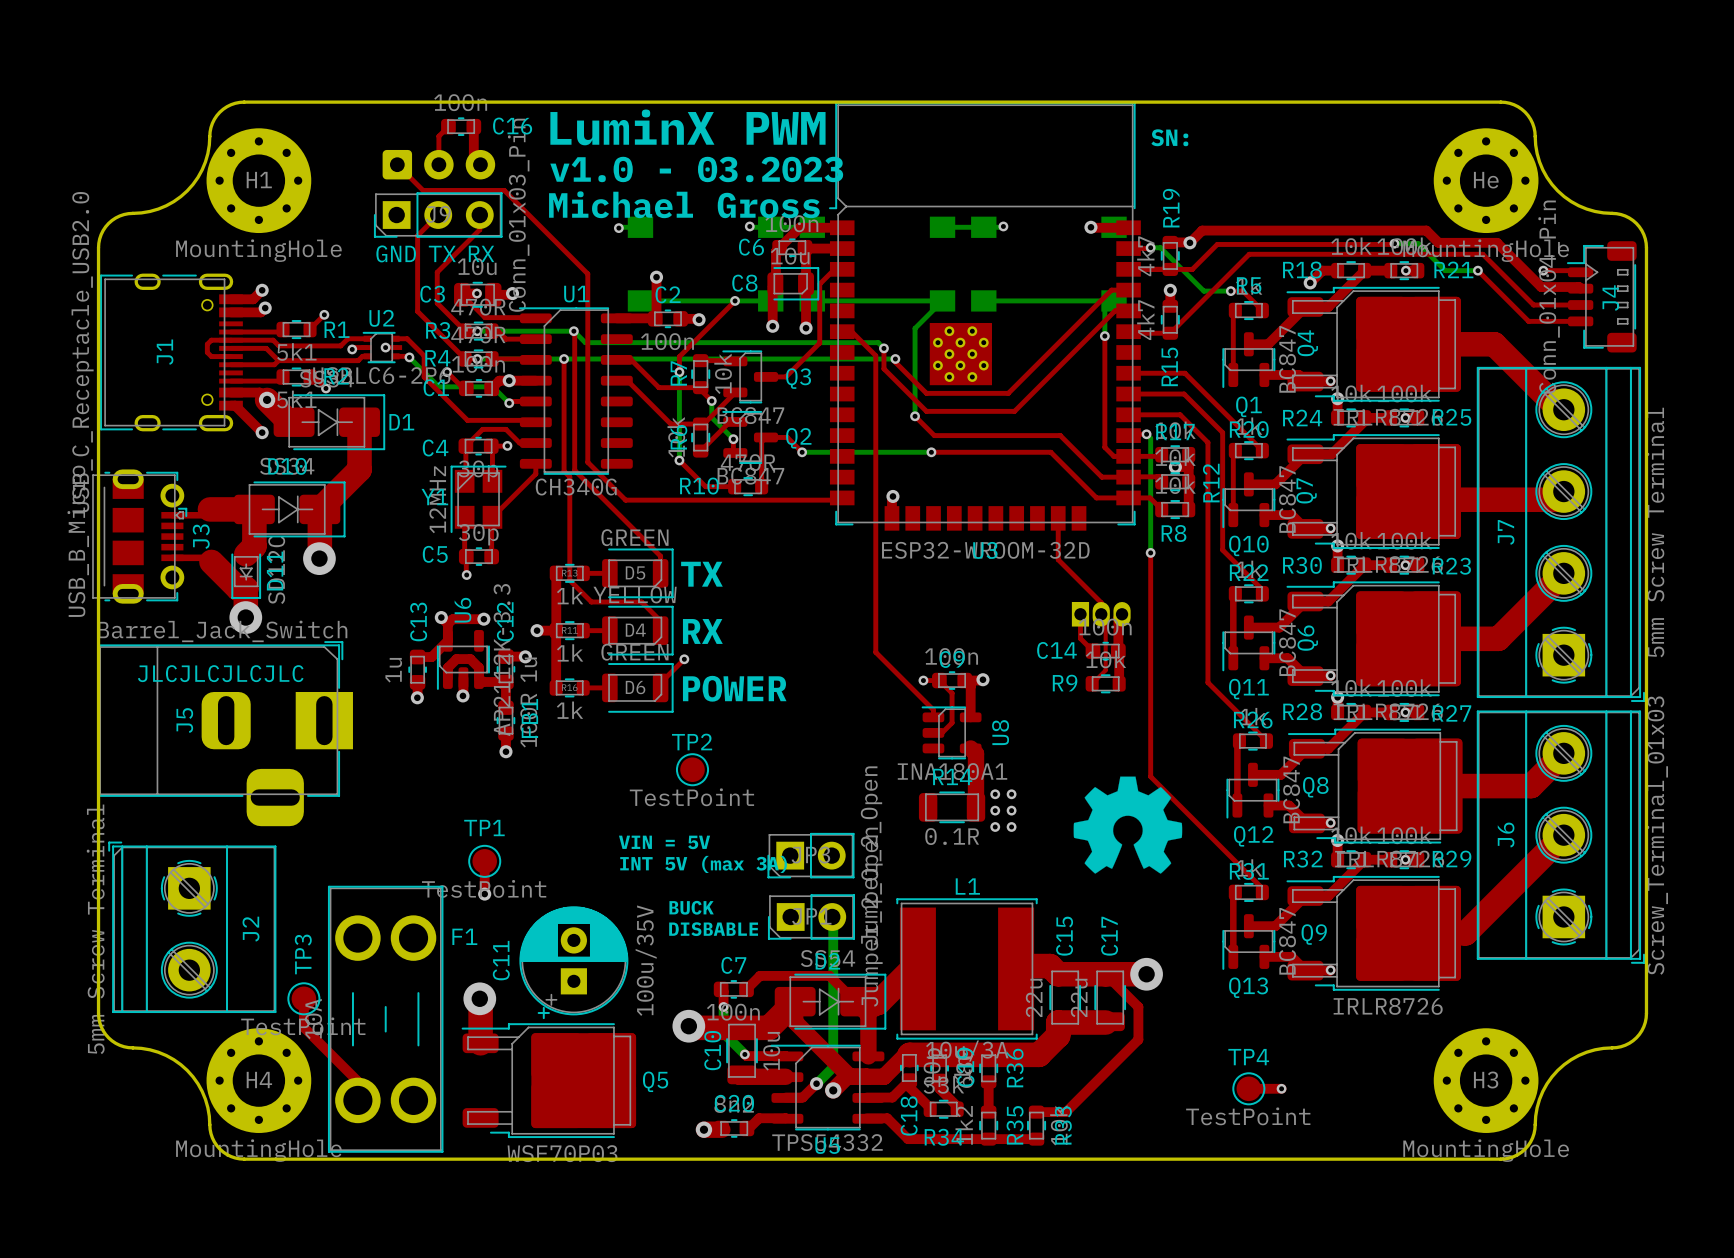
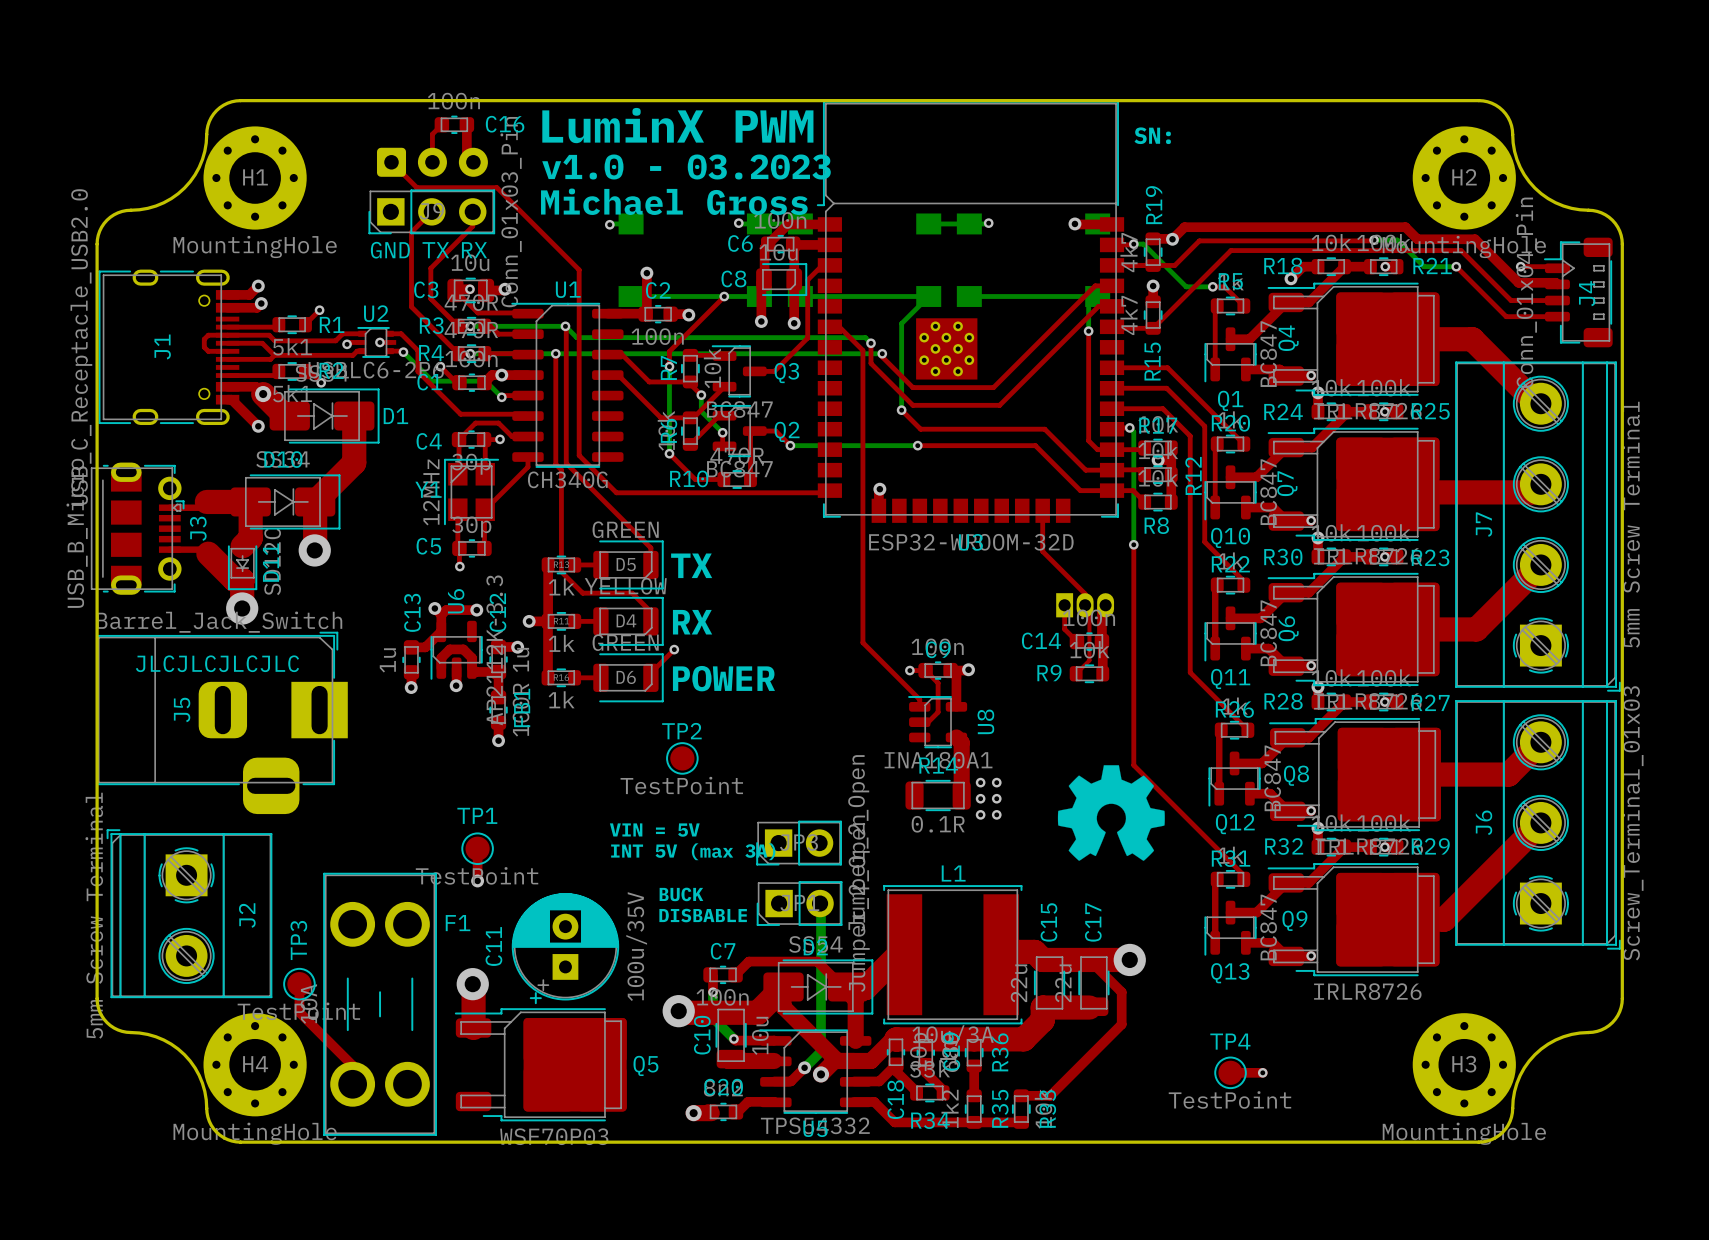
He name: He (1486, 180) -> H2 (1464, 177)

